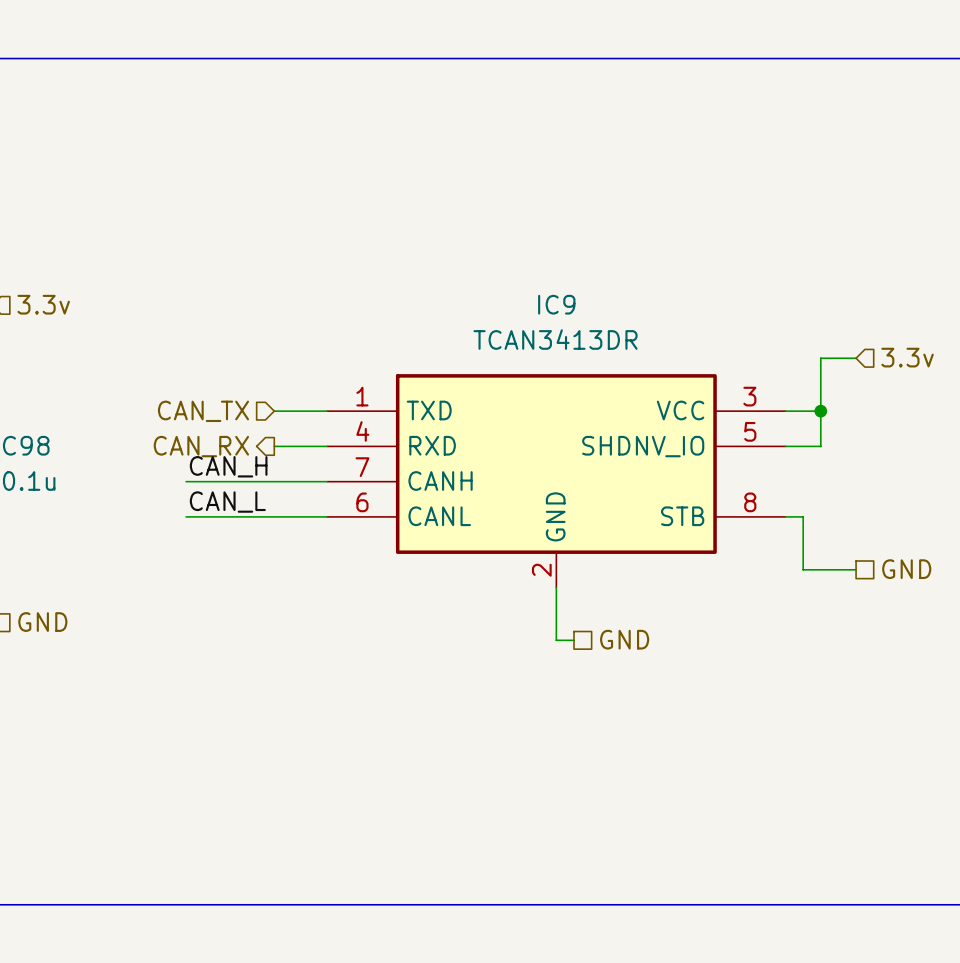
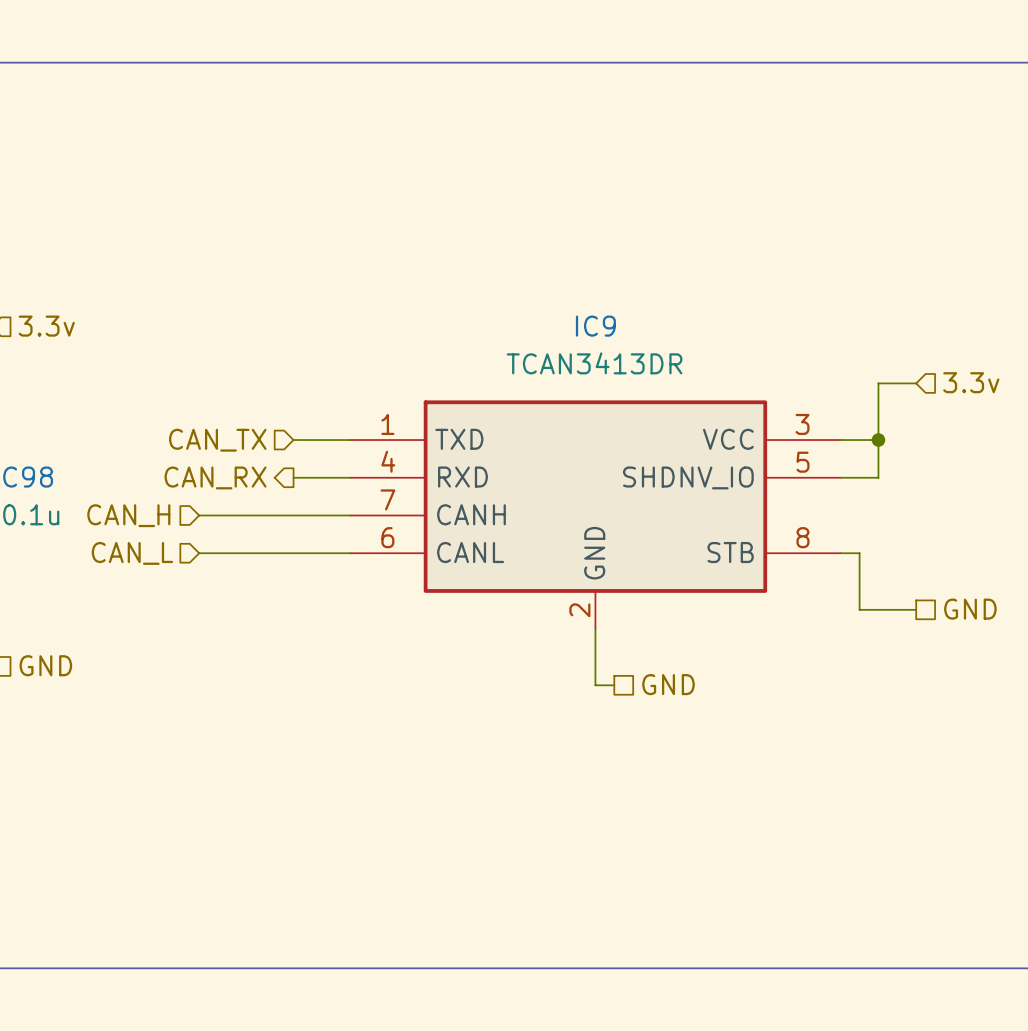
label: CAN_H (228, 466) -> none
hierarchical label: none -> CAN_H (128, 515)
label: CAN_L (227, 502) -> none
hierarchical label: none -> CAN_L (132, 553)

